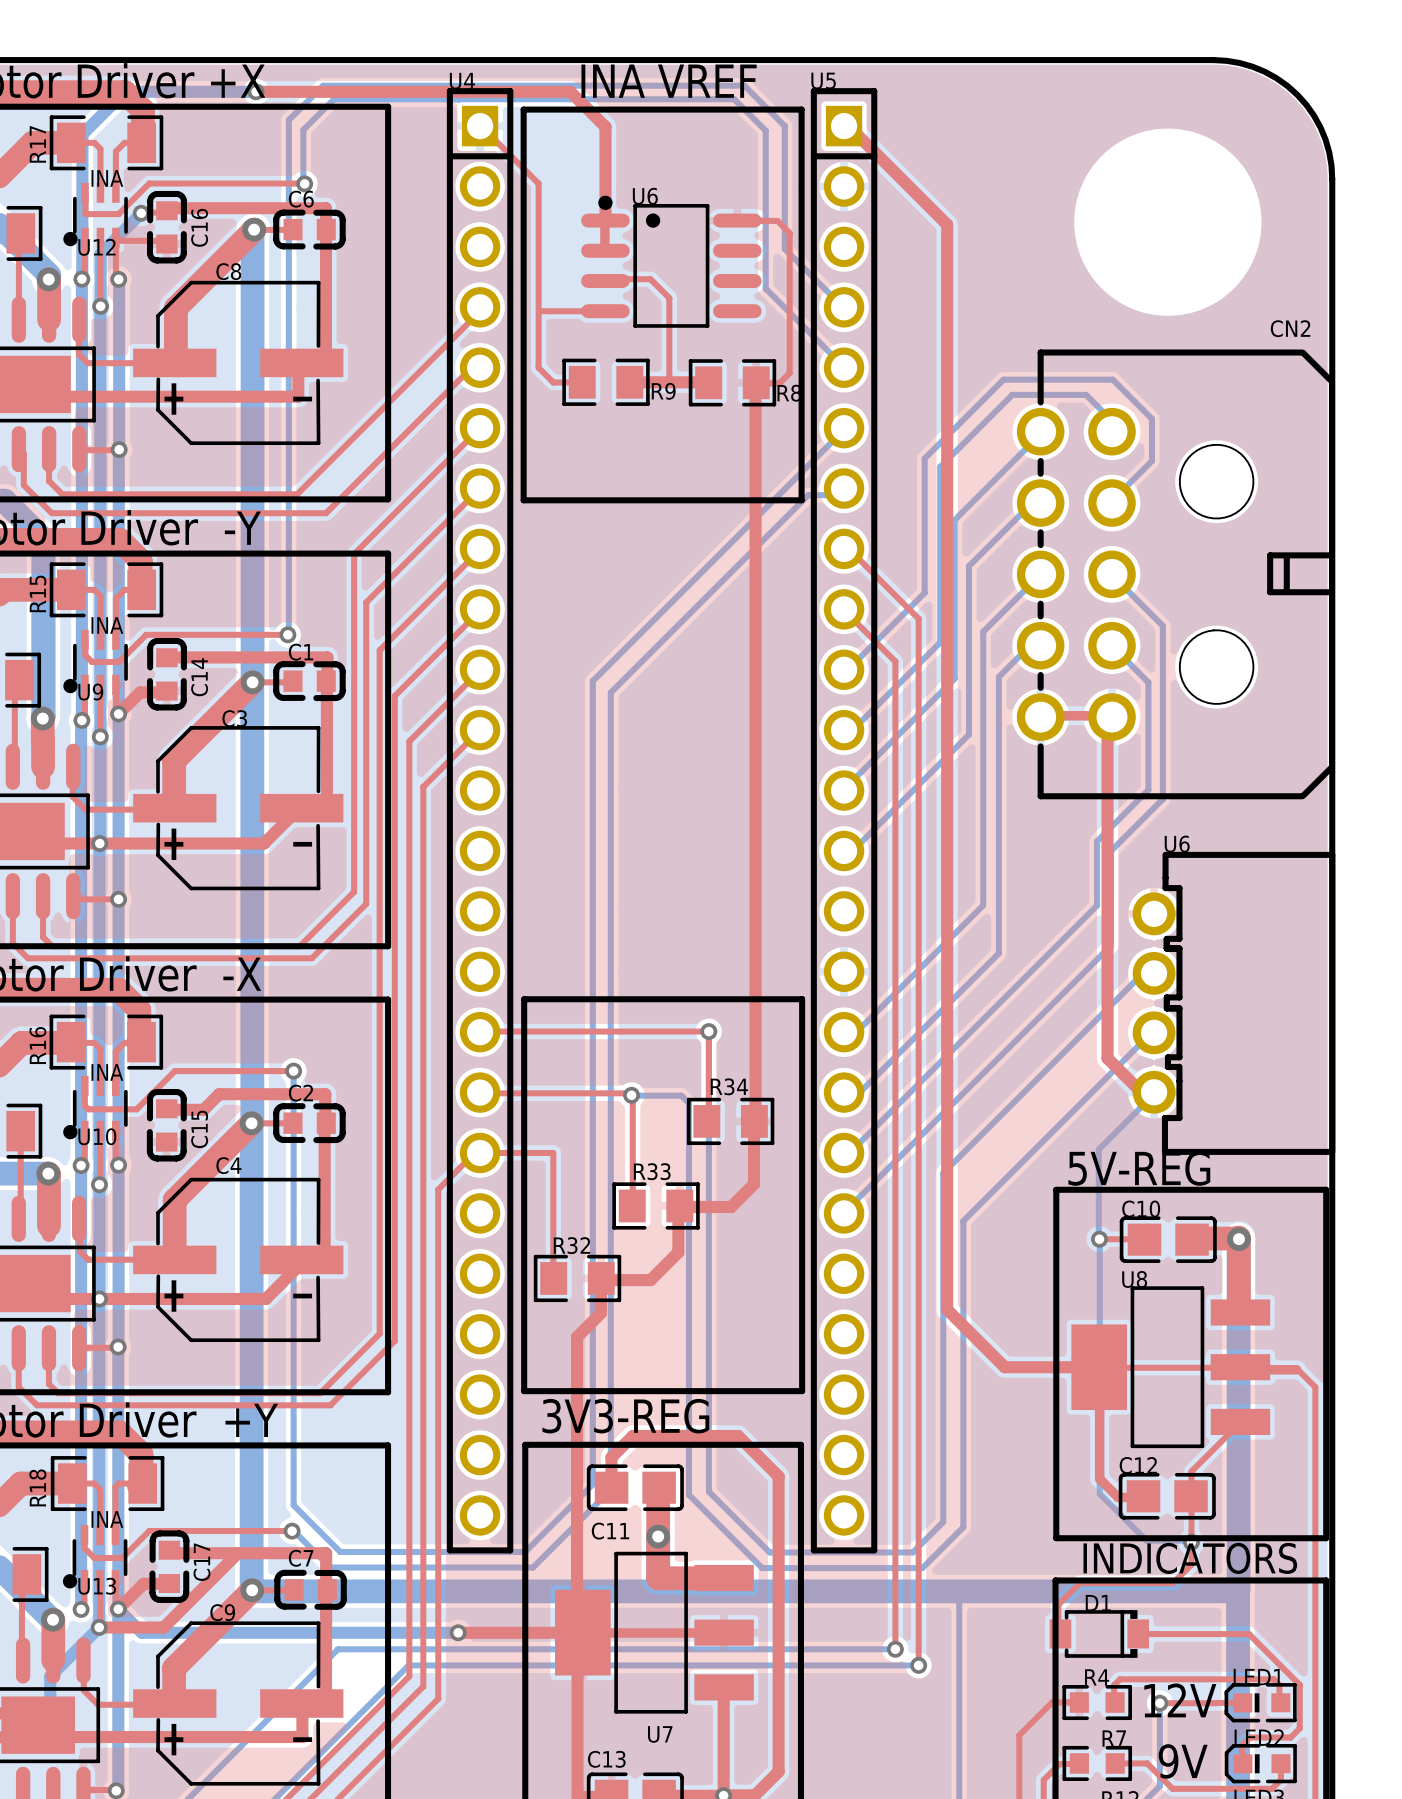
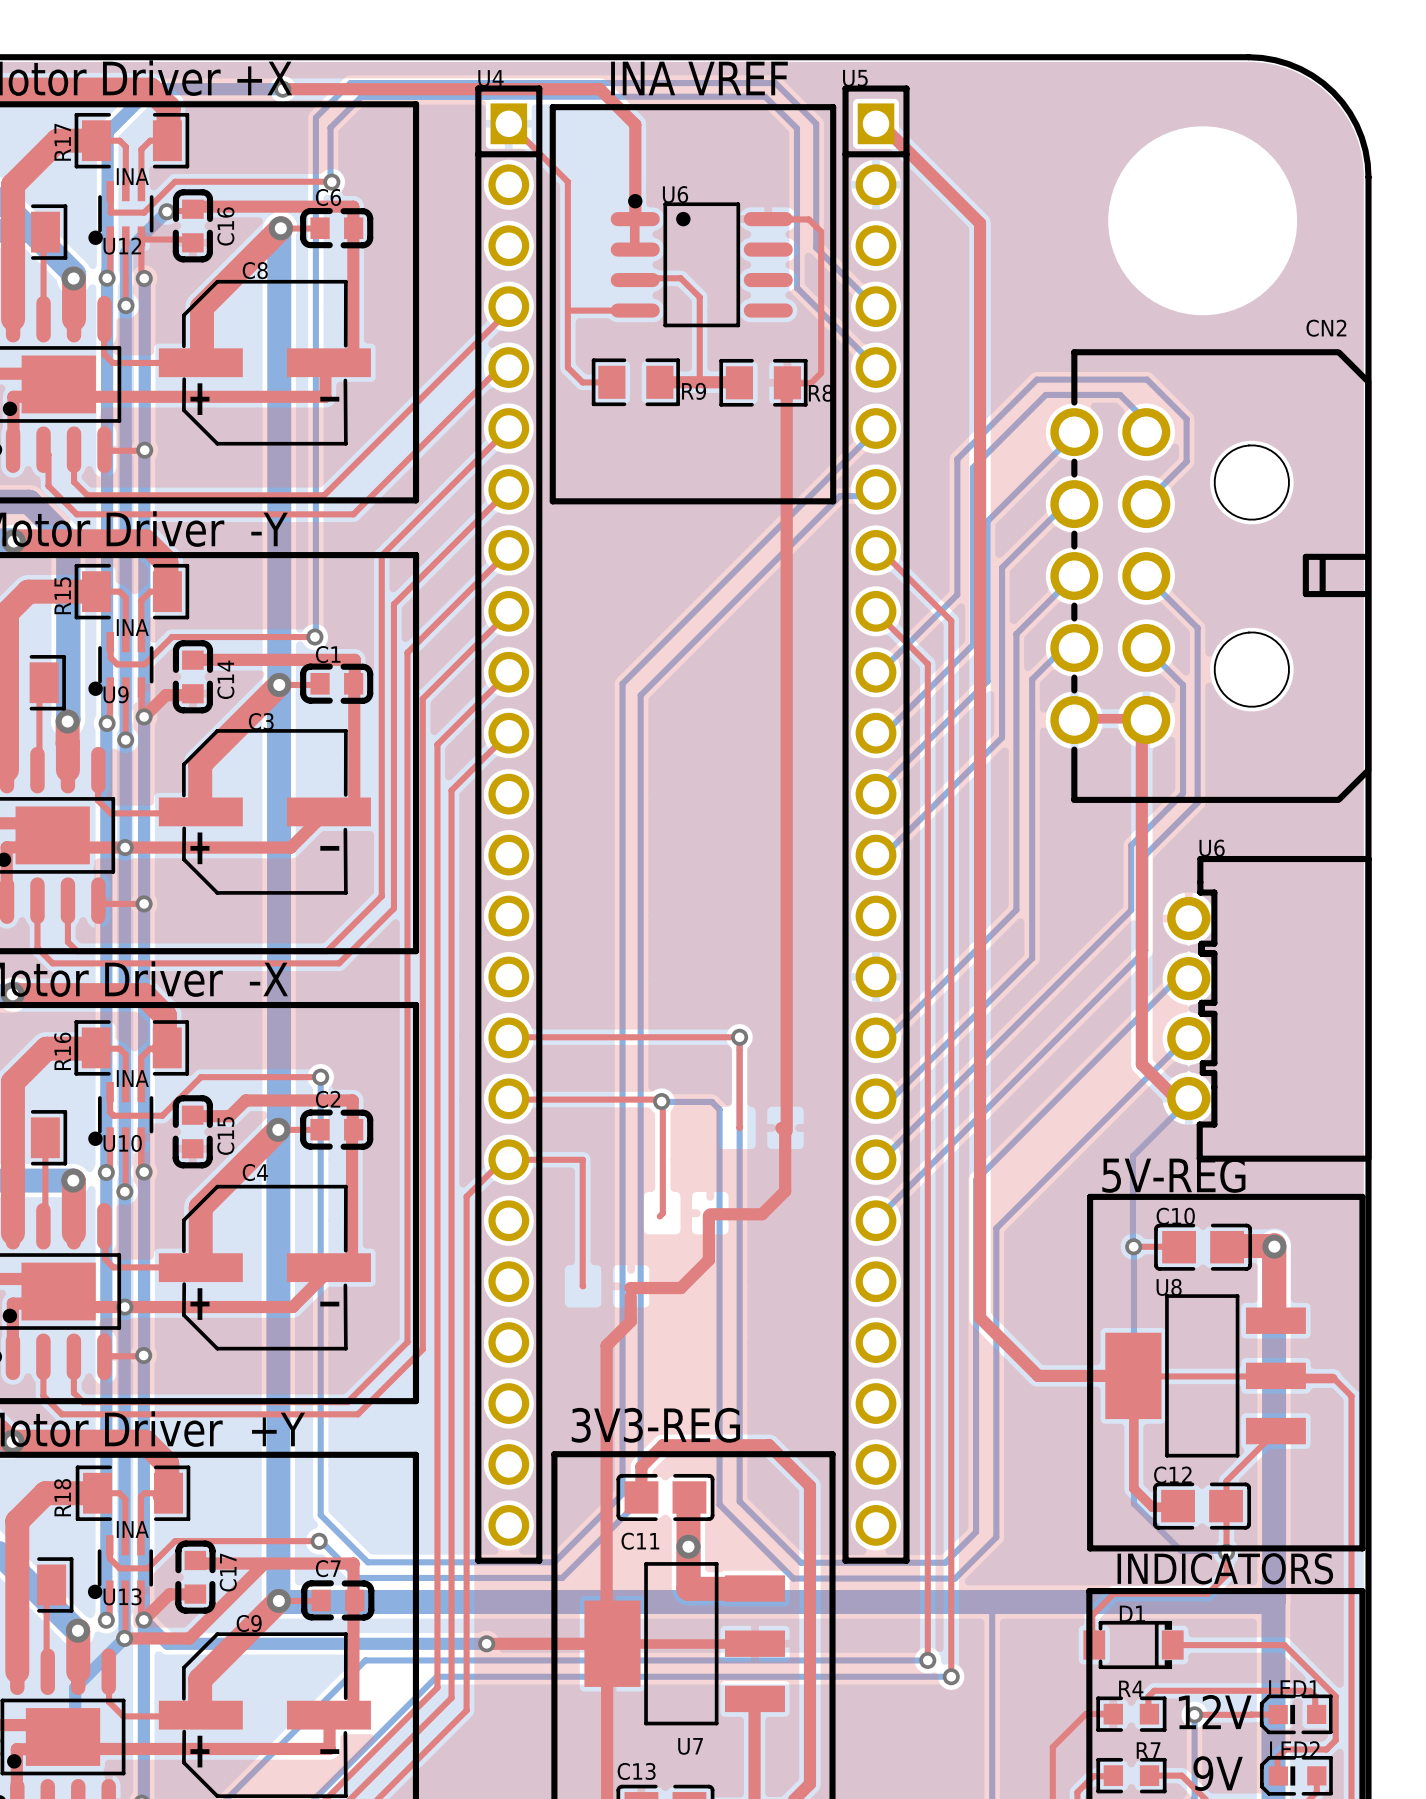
line: (524, 999) (802, 999) (802, 1391) (524, 1391) (524, 999) -> none
R34: (730, 1121) -> none
R33: (656, 1205) -> none
R32: (577, 1278) -> none

